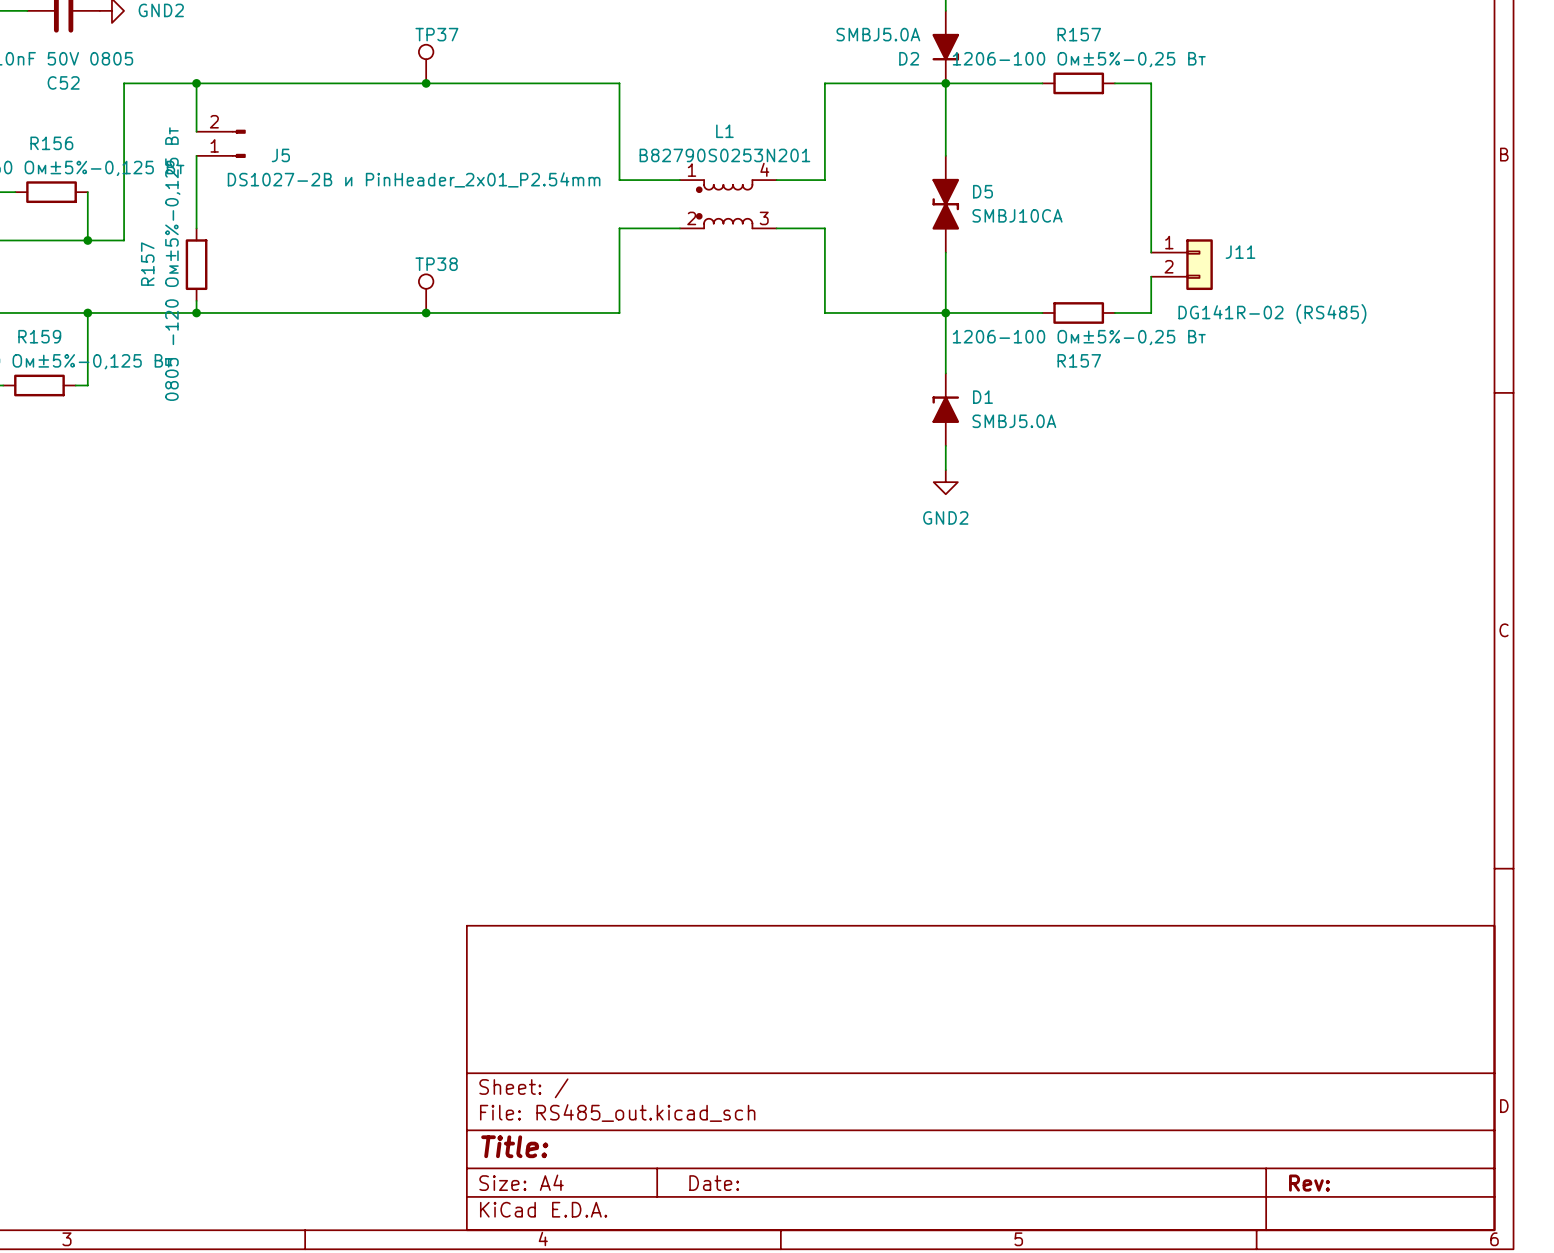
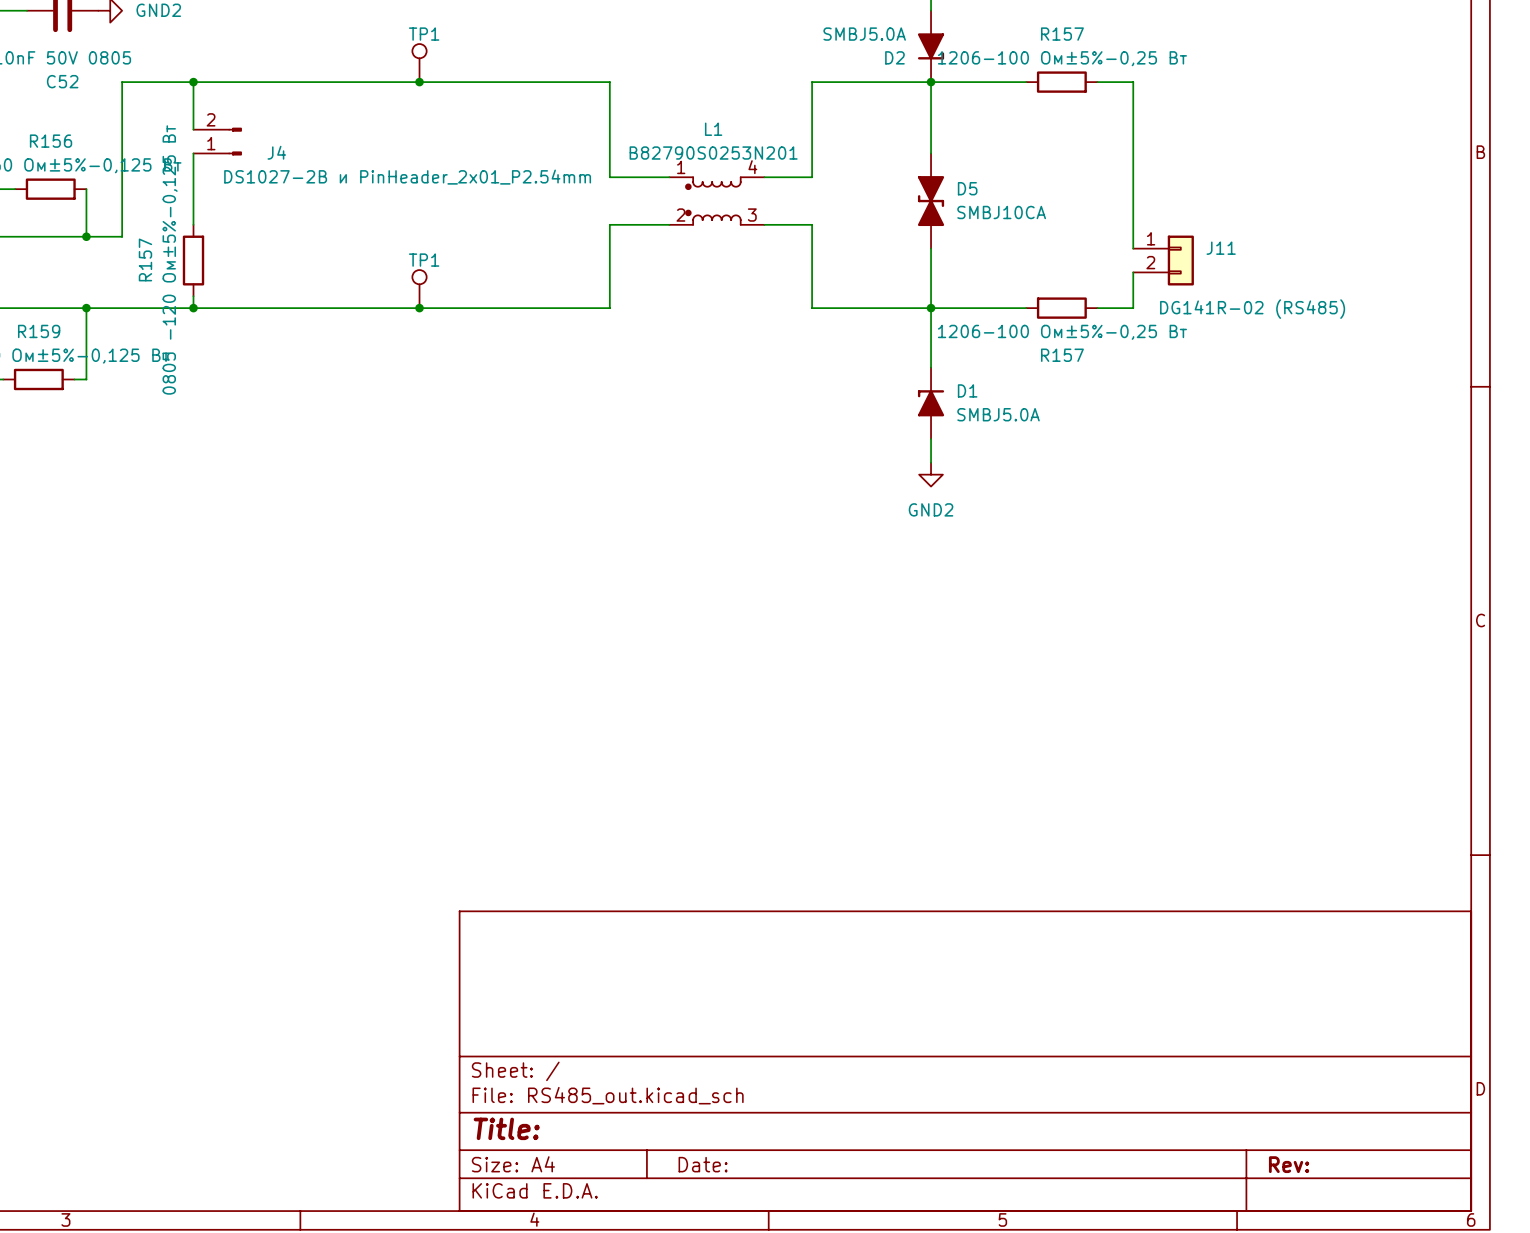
TP37 name: TP37 (436, 34) -> TP1 (424, 34)
J5 name: J5 (280, 155) -> J4 (276, 152)
TP38 name: TP38 (436, 264) -> TP1 (424, 260)

